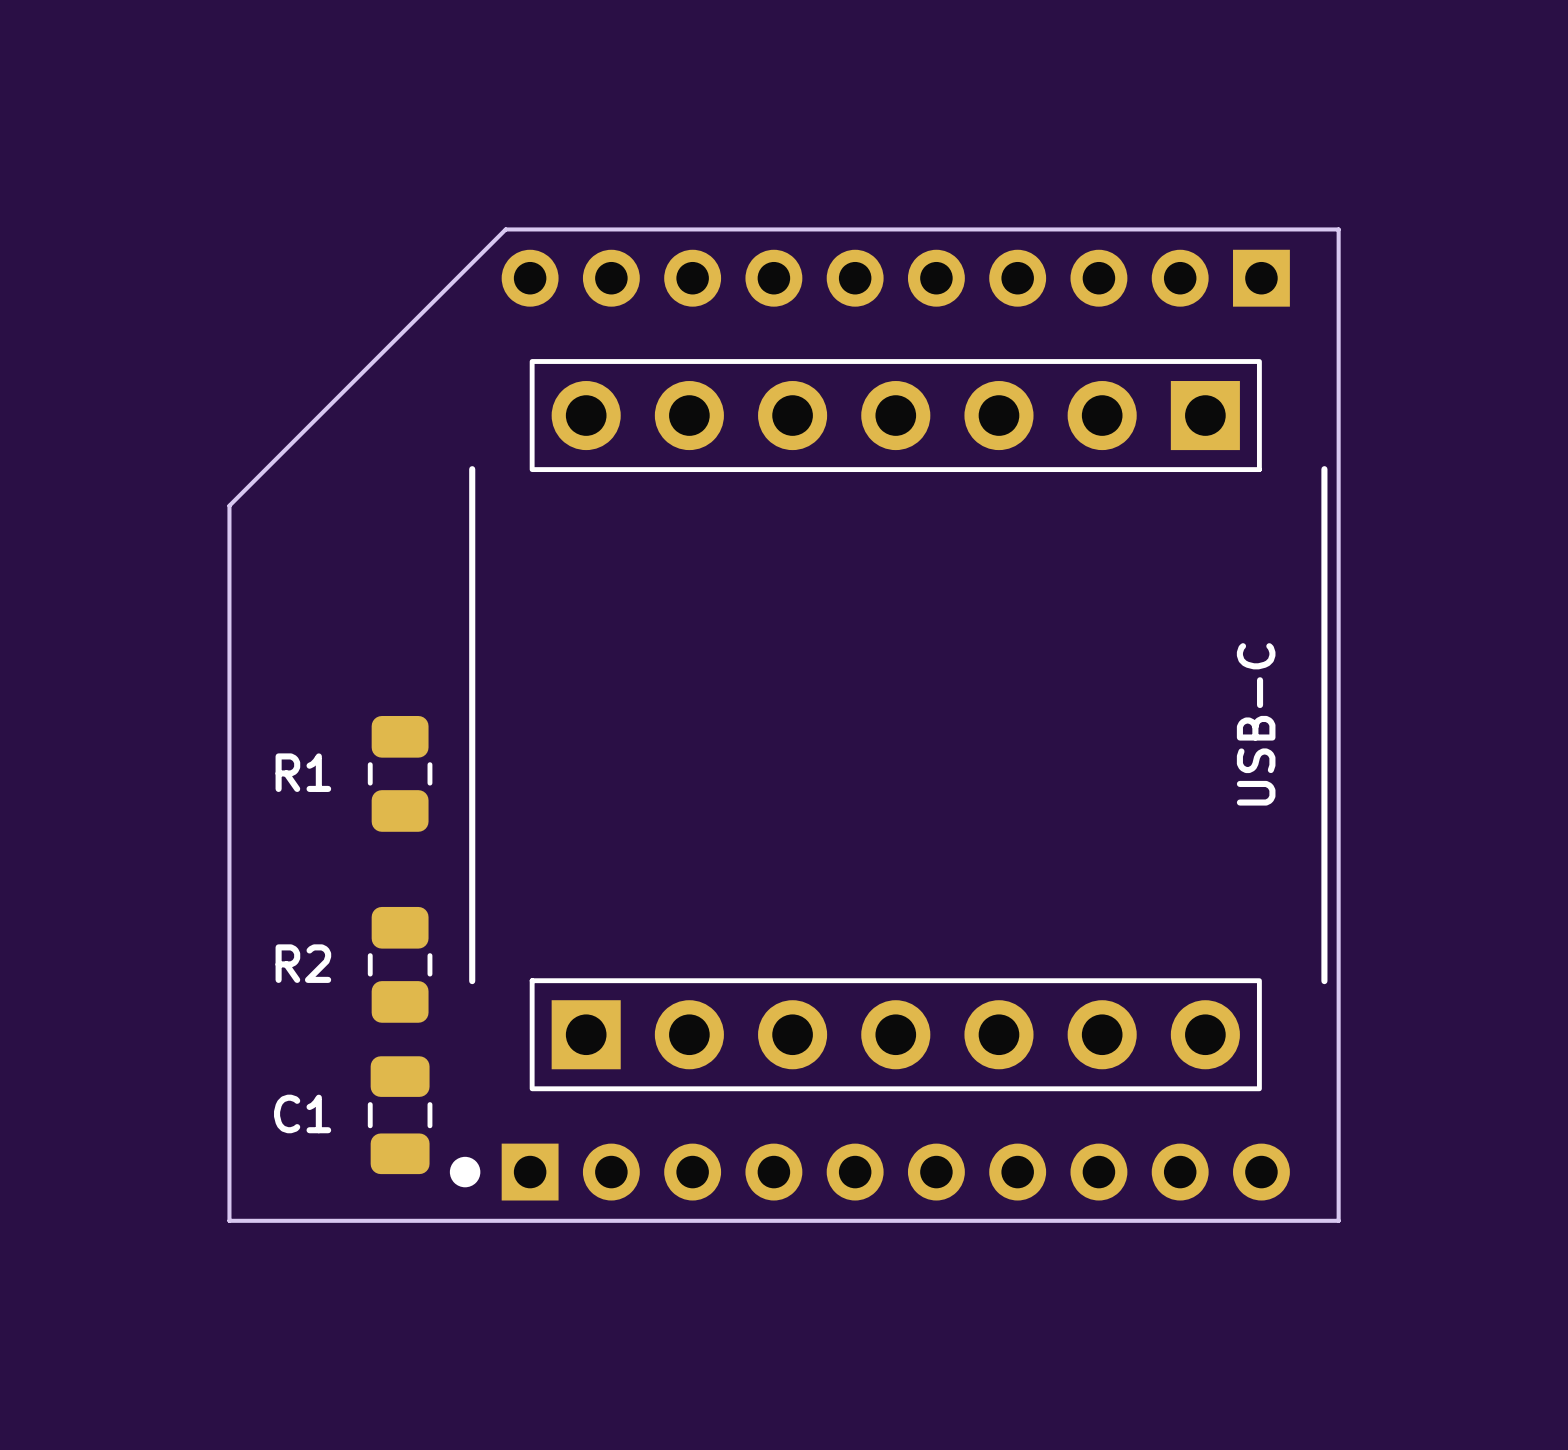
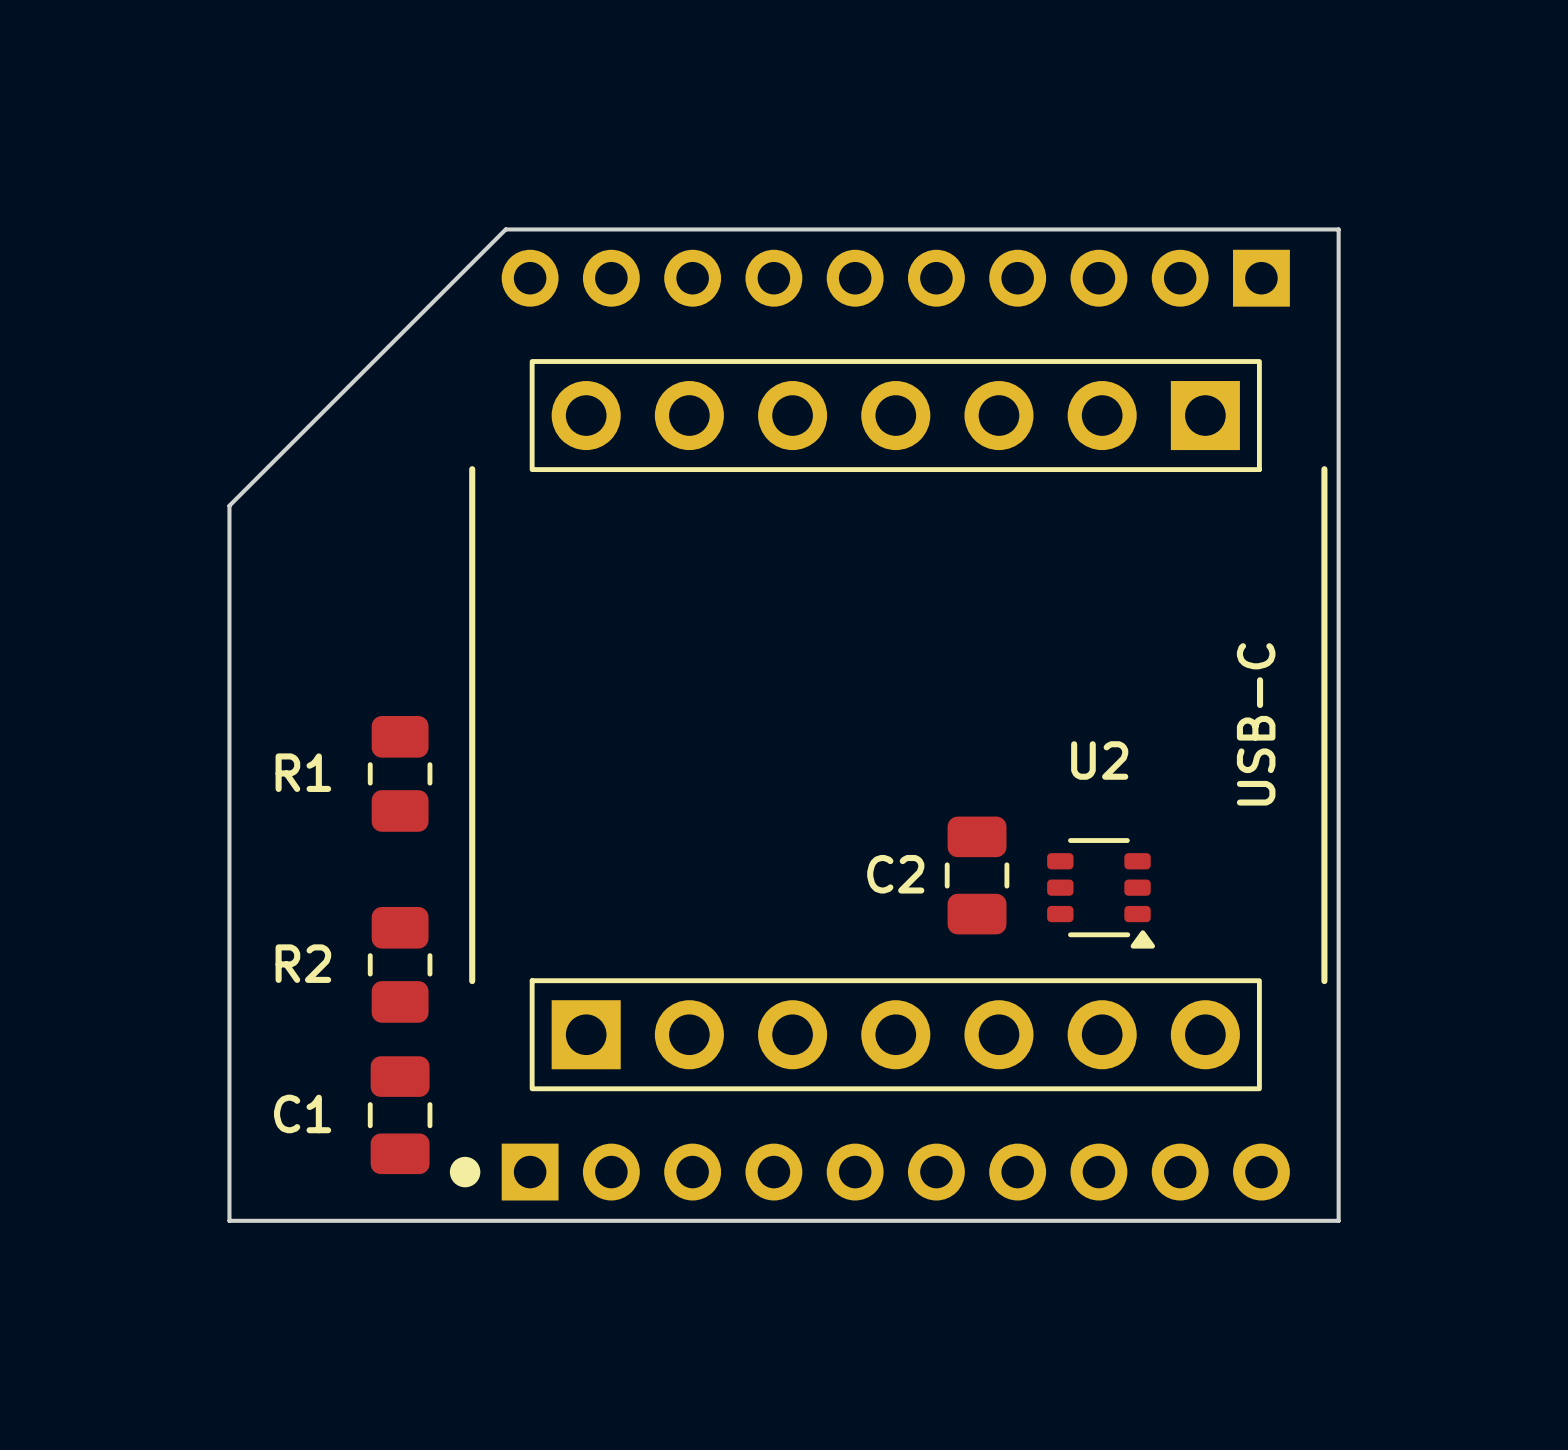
text: none -> U2 (1099, 760)
text: none -> C2 (895, 874)
part: none -> (977, 875)
part: none -> (1101, 893)

